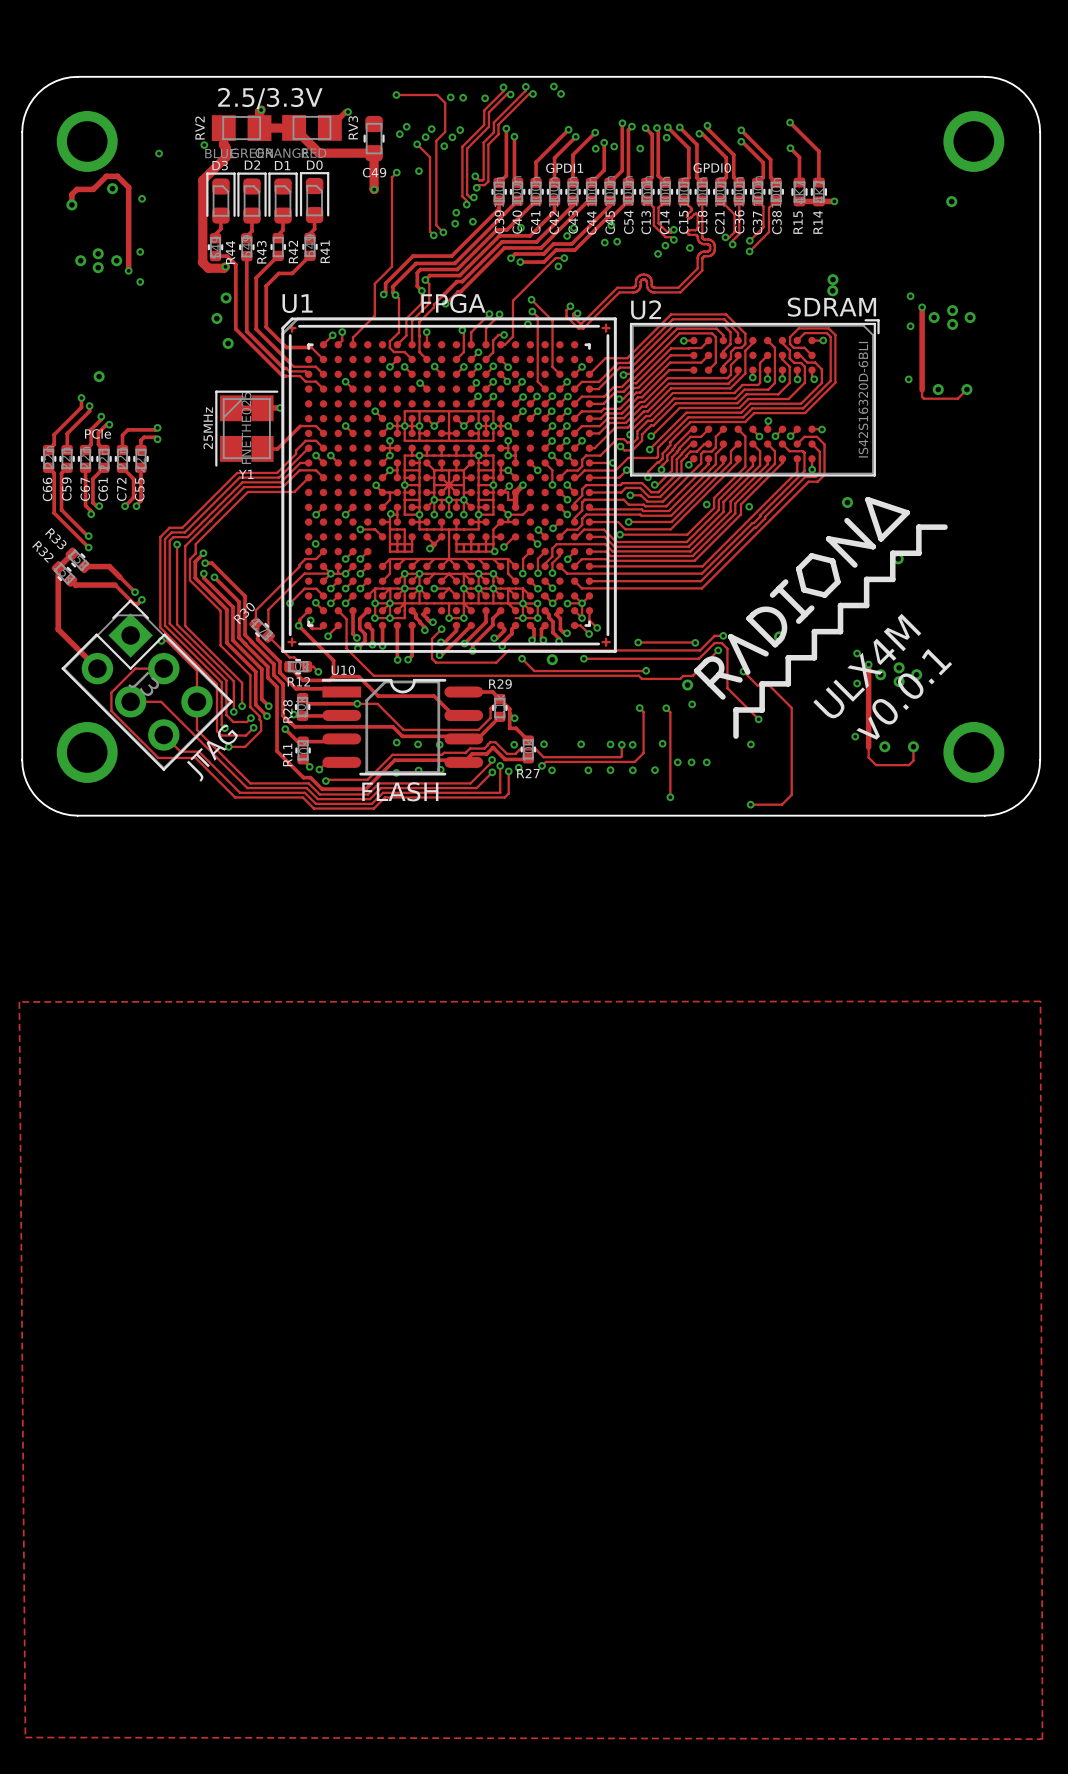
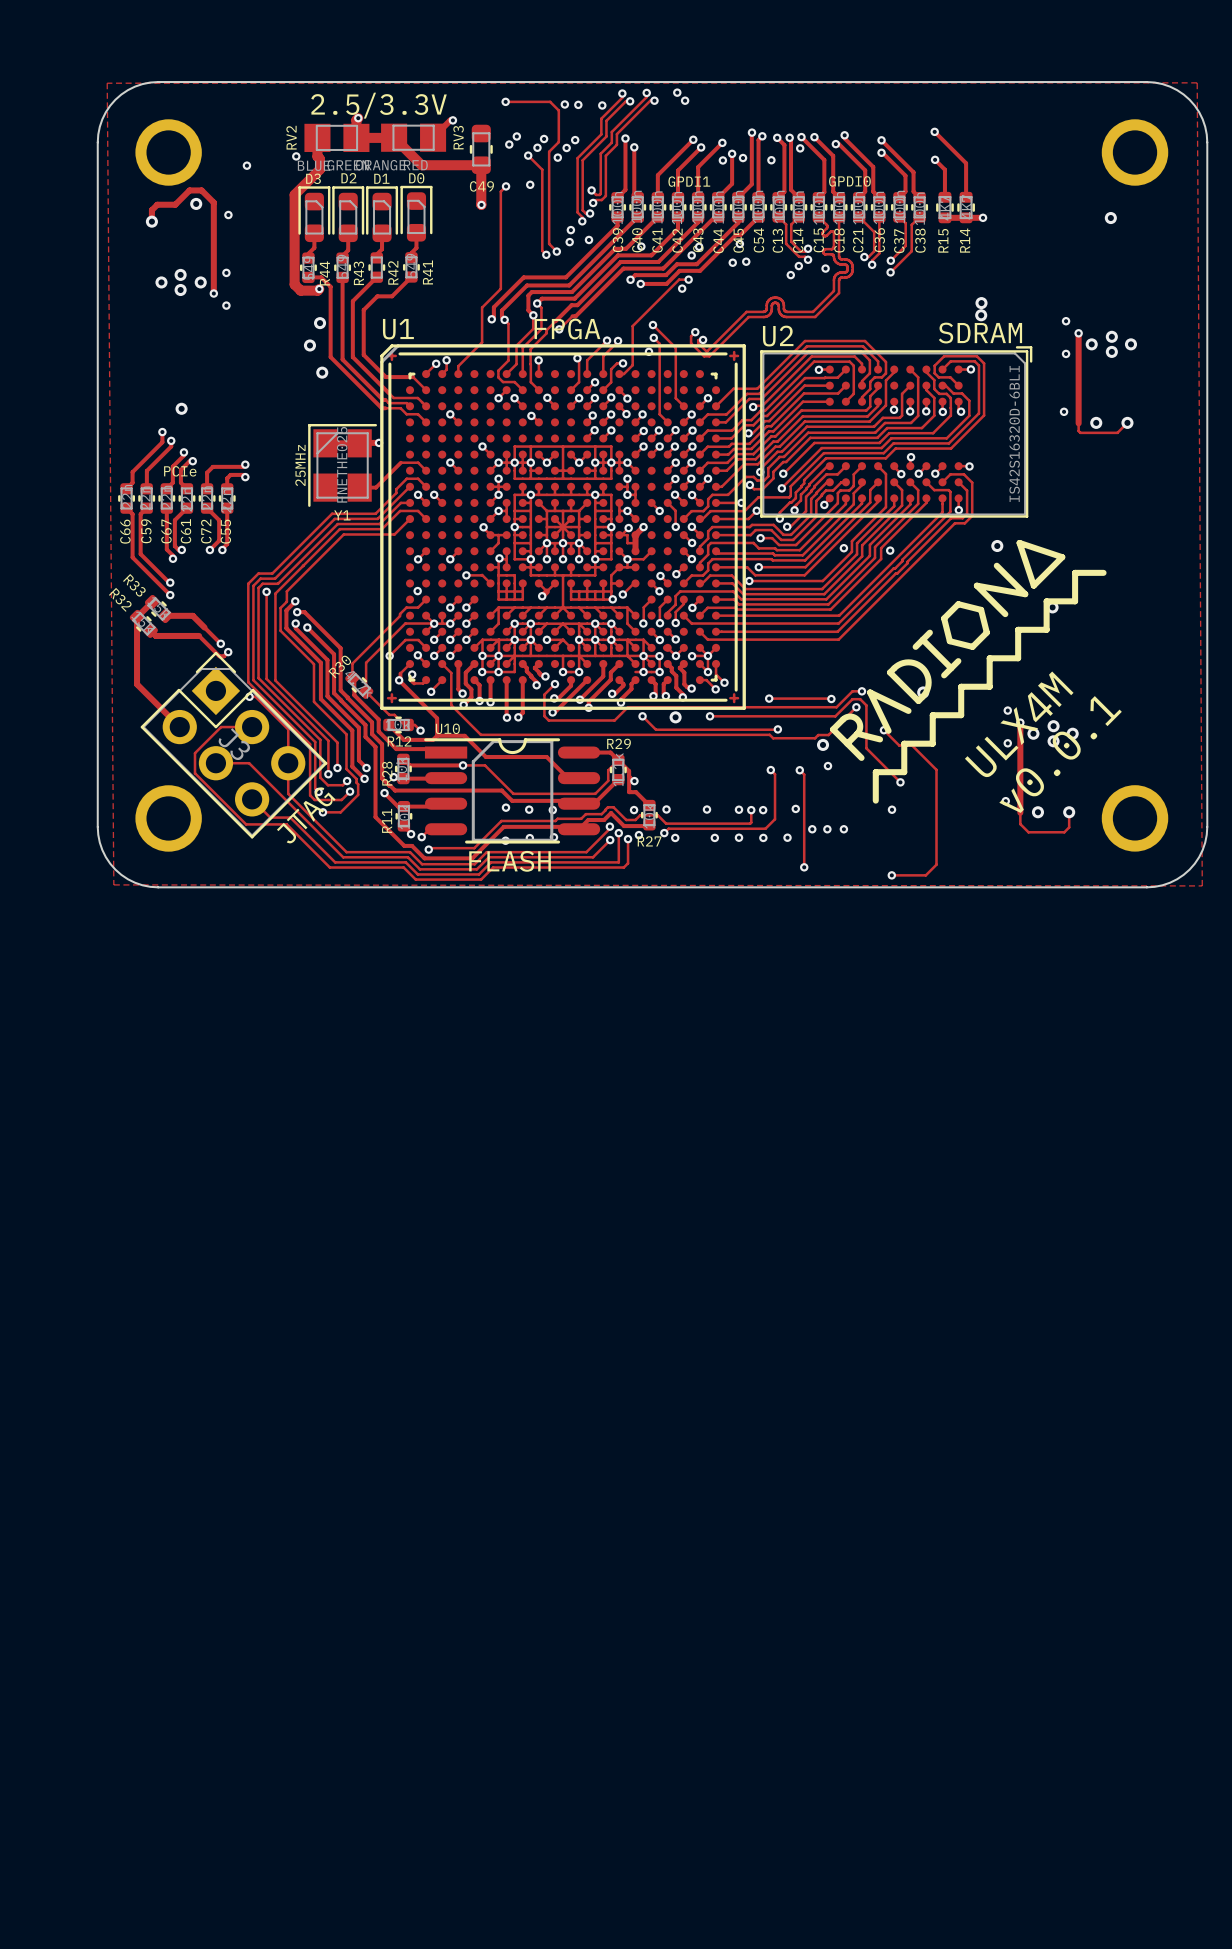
zone outline: none -> (1197, 82) (1202, 885) (113, 884) (107, 83) (1197, 82)
zone outline: (1040, 1001) (1042, 1739) (25, 1737) (19, 1001) (1040, 1001) -> none

